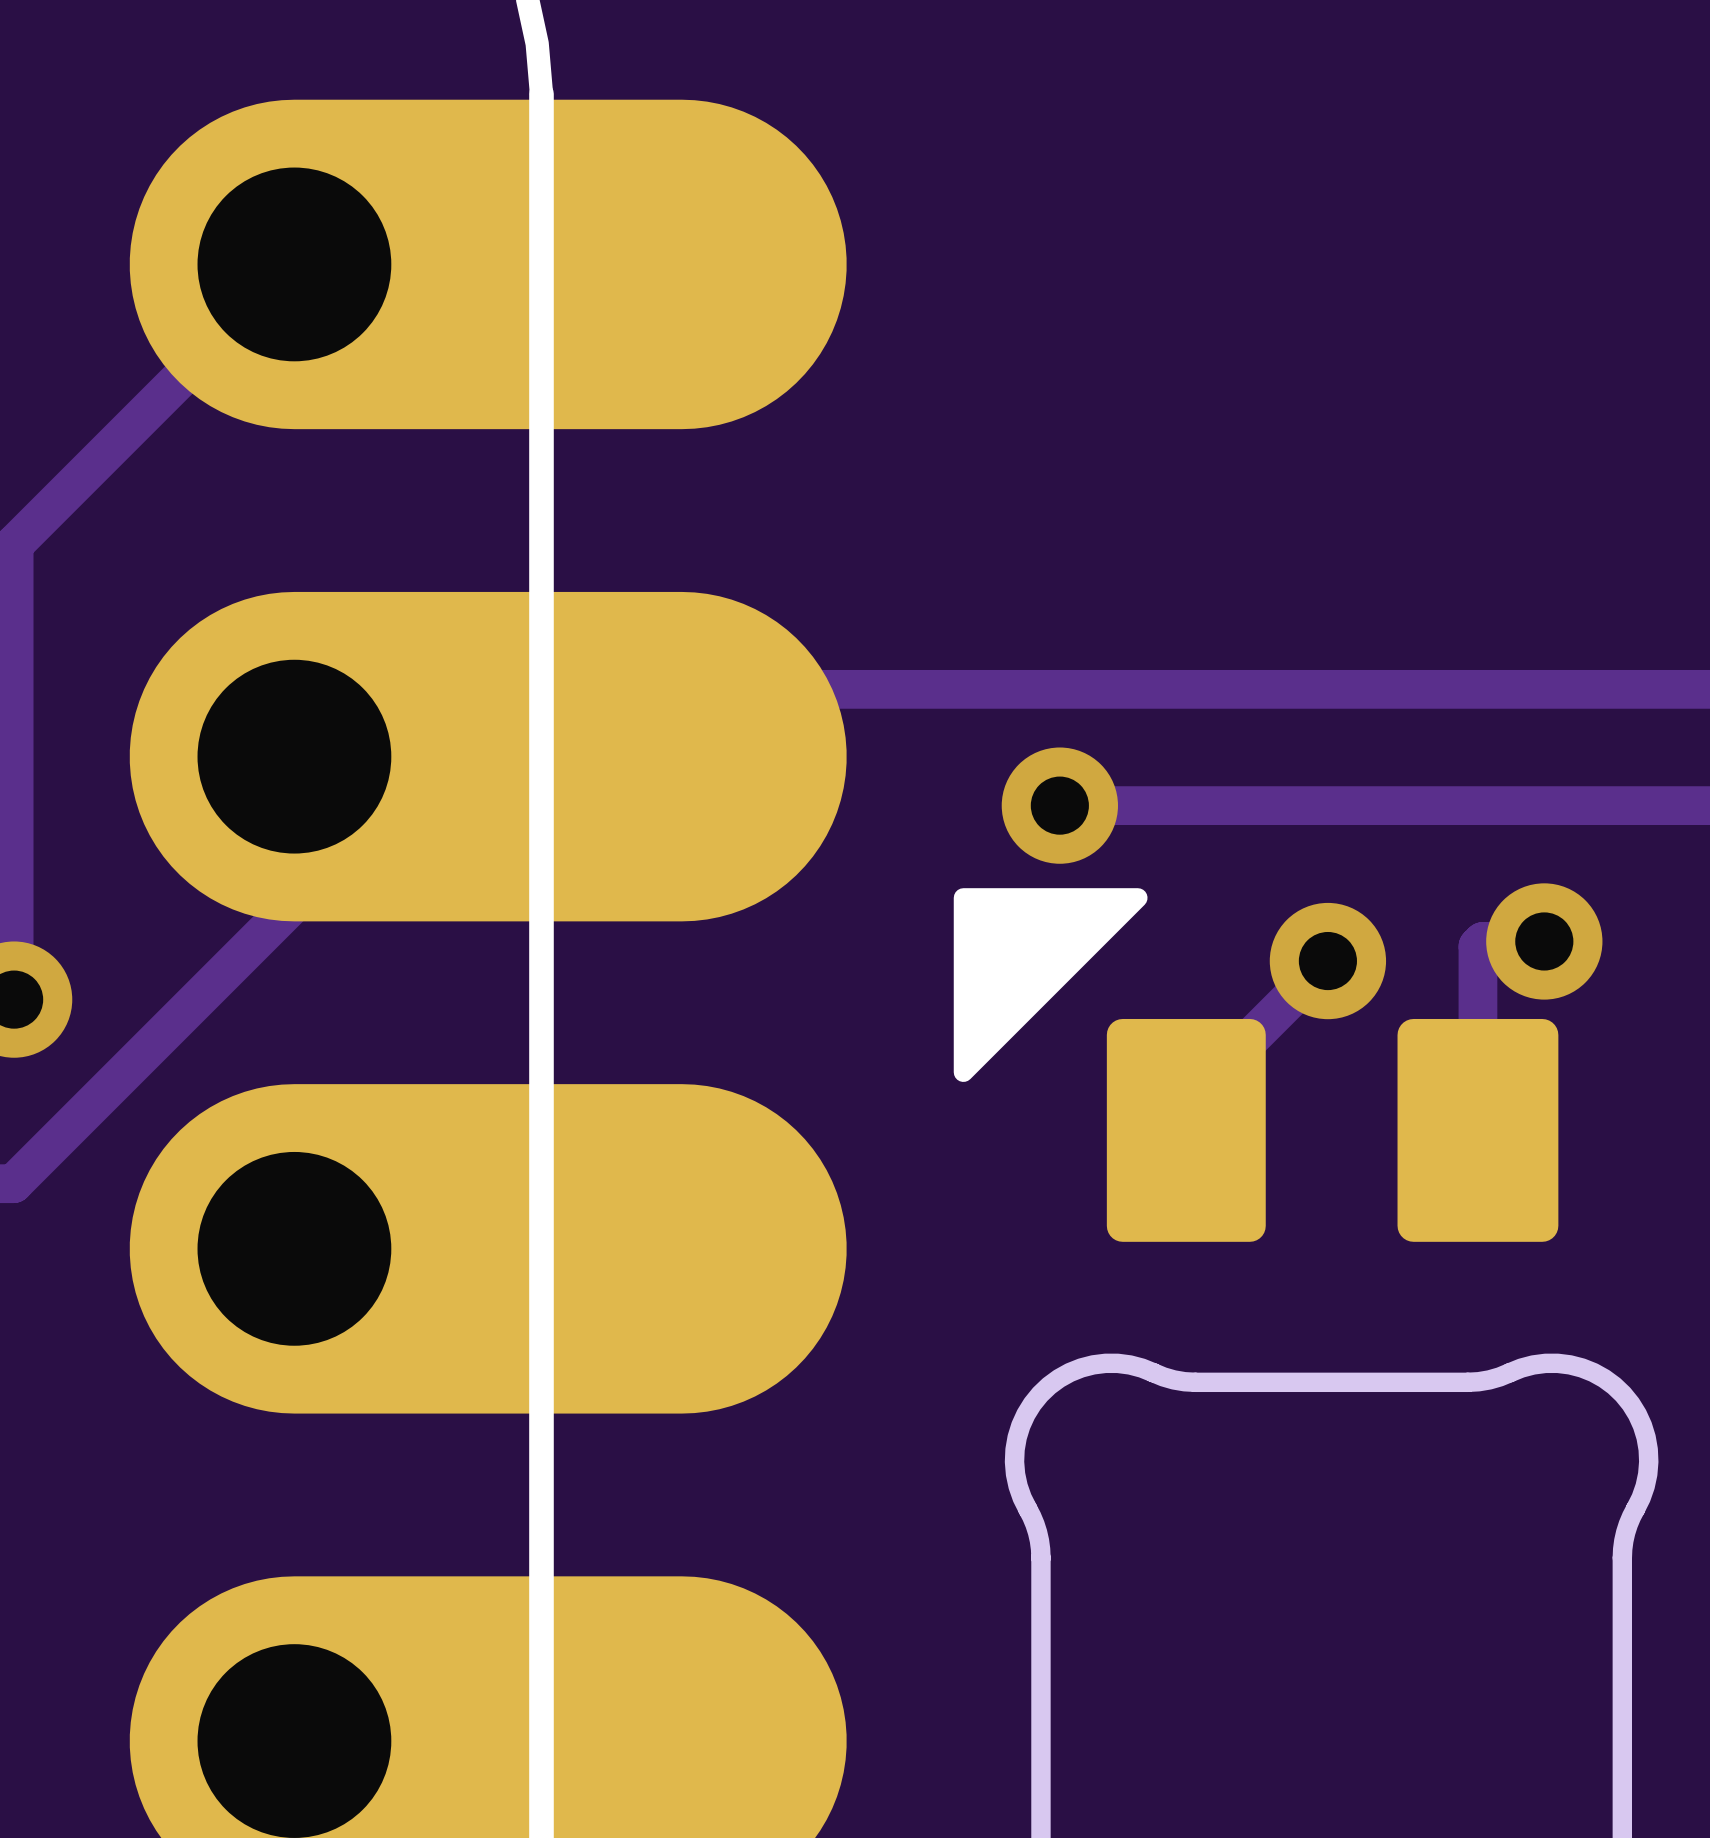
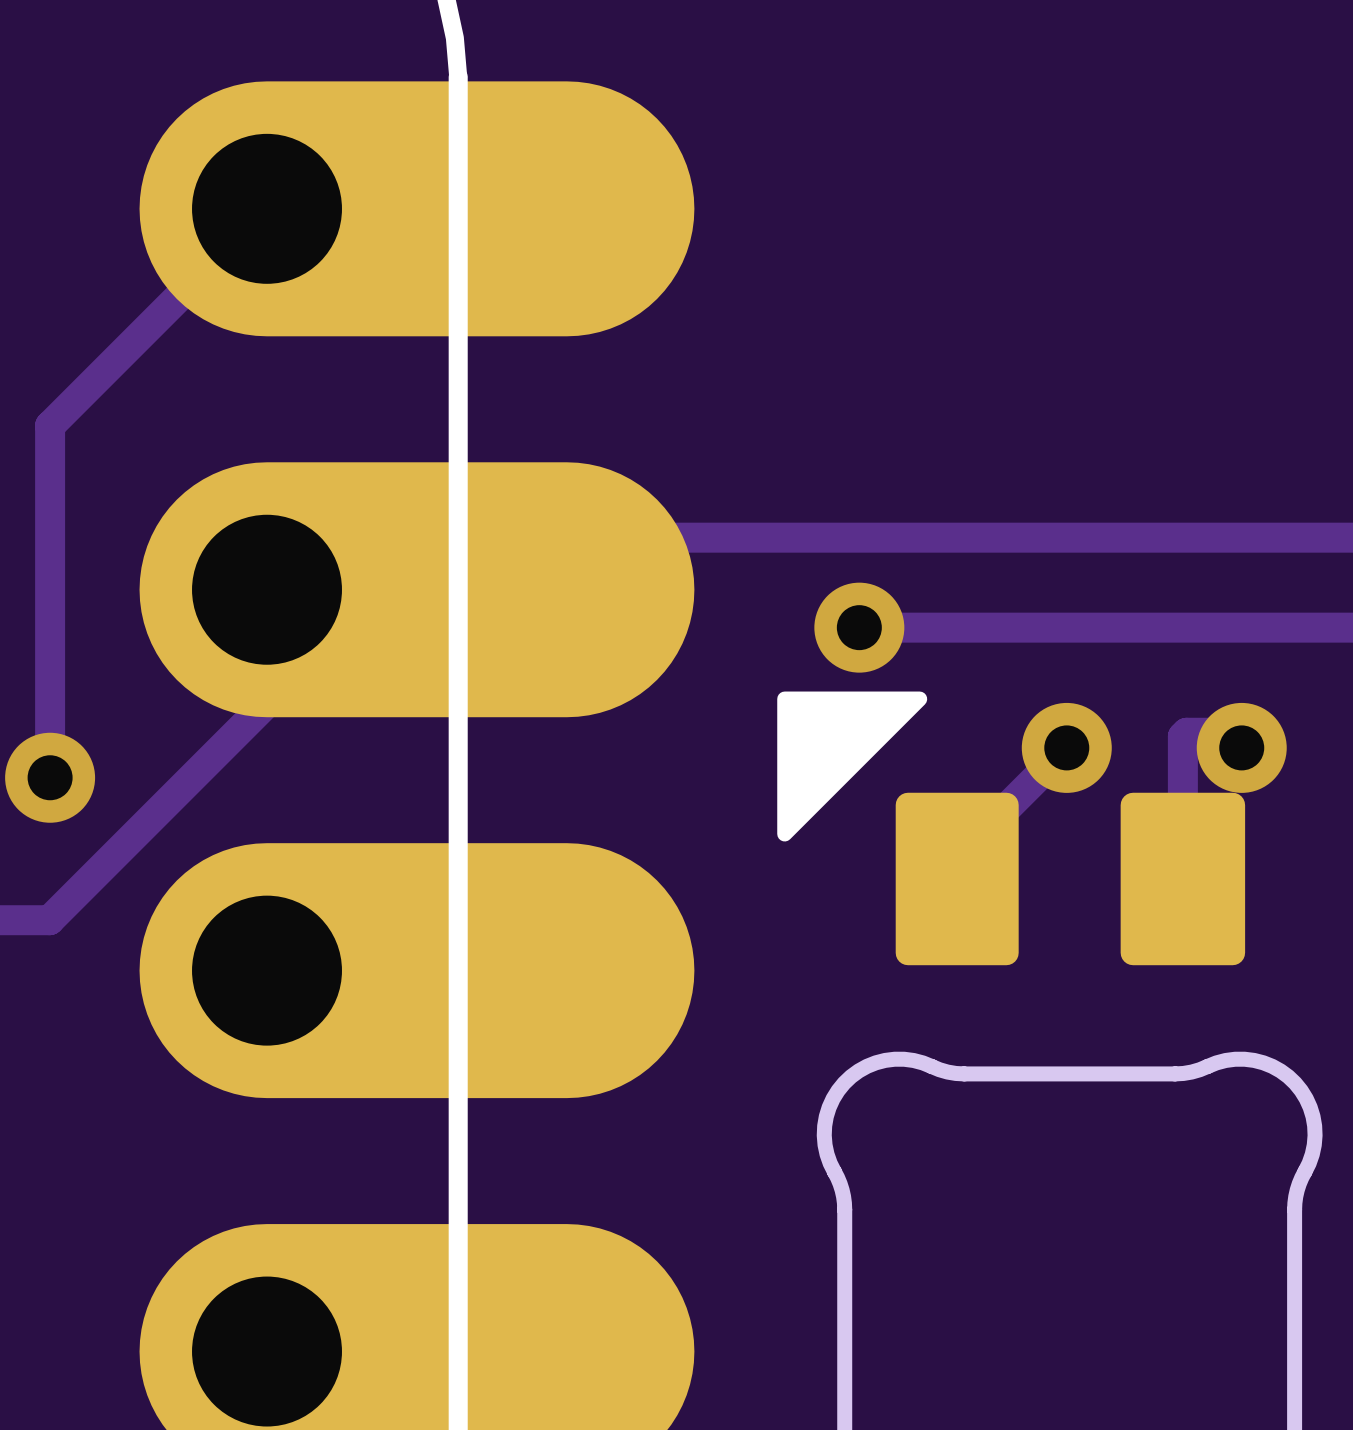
via position: (1544, 941) -> (1241, 747)

